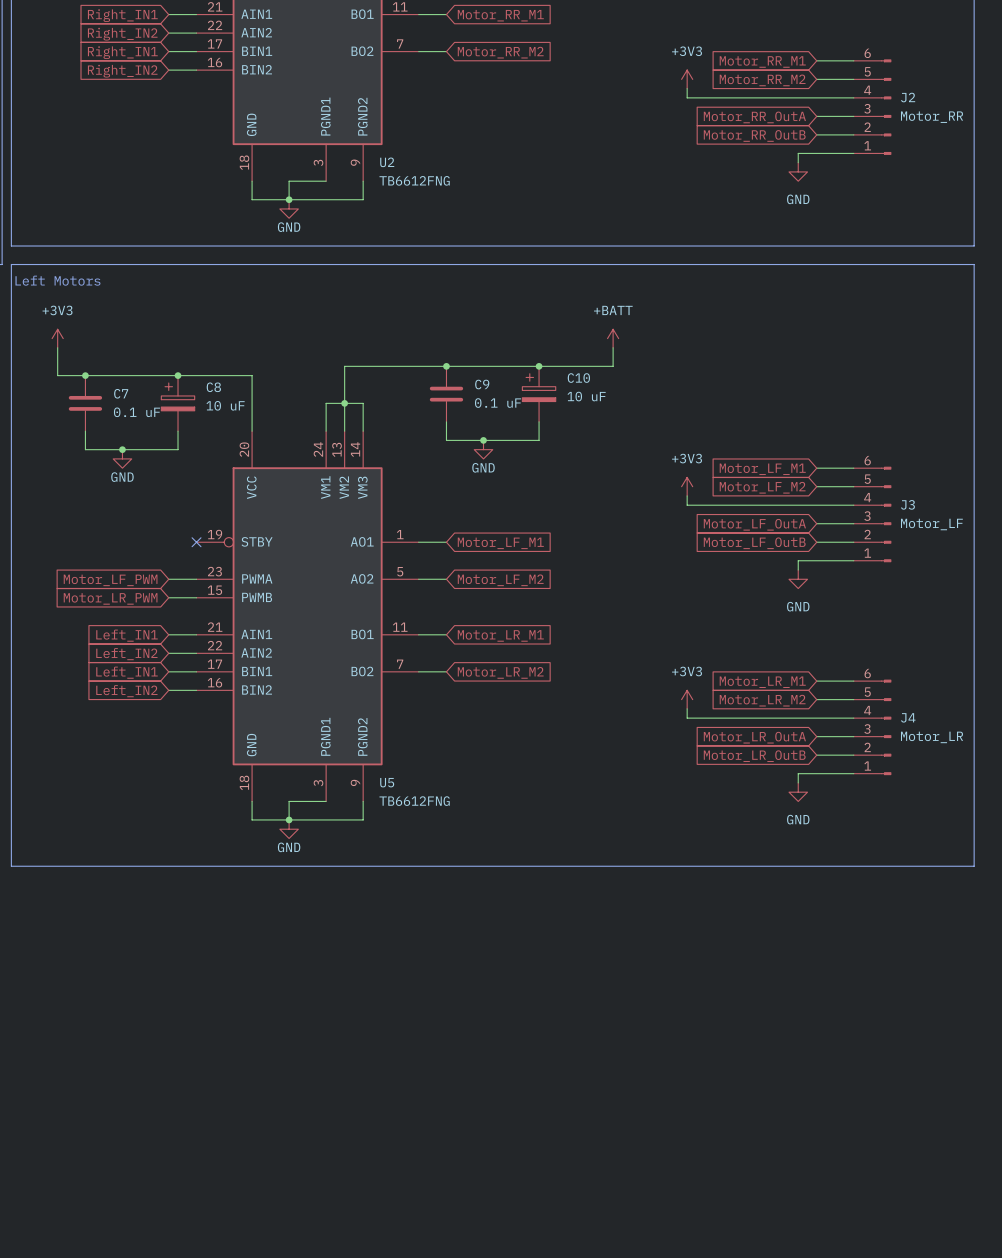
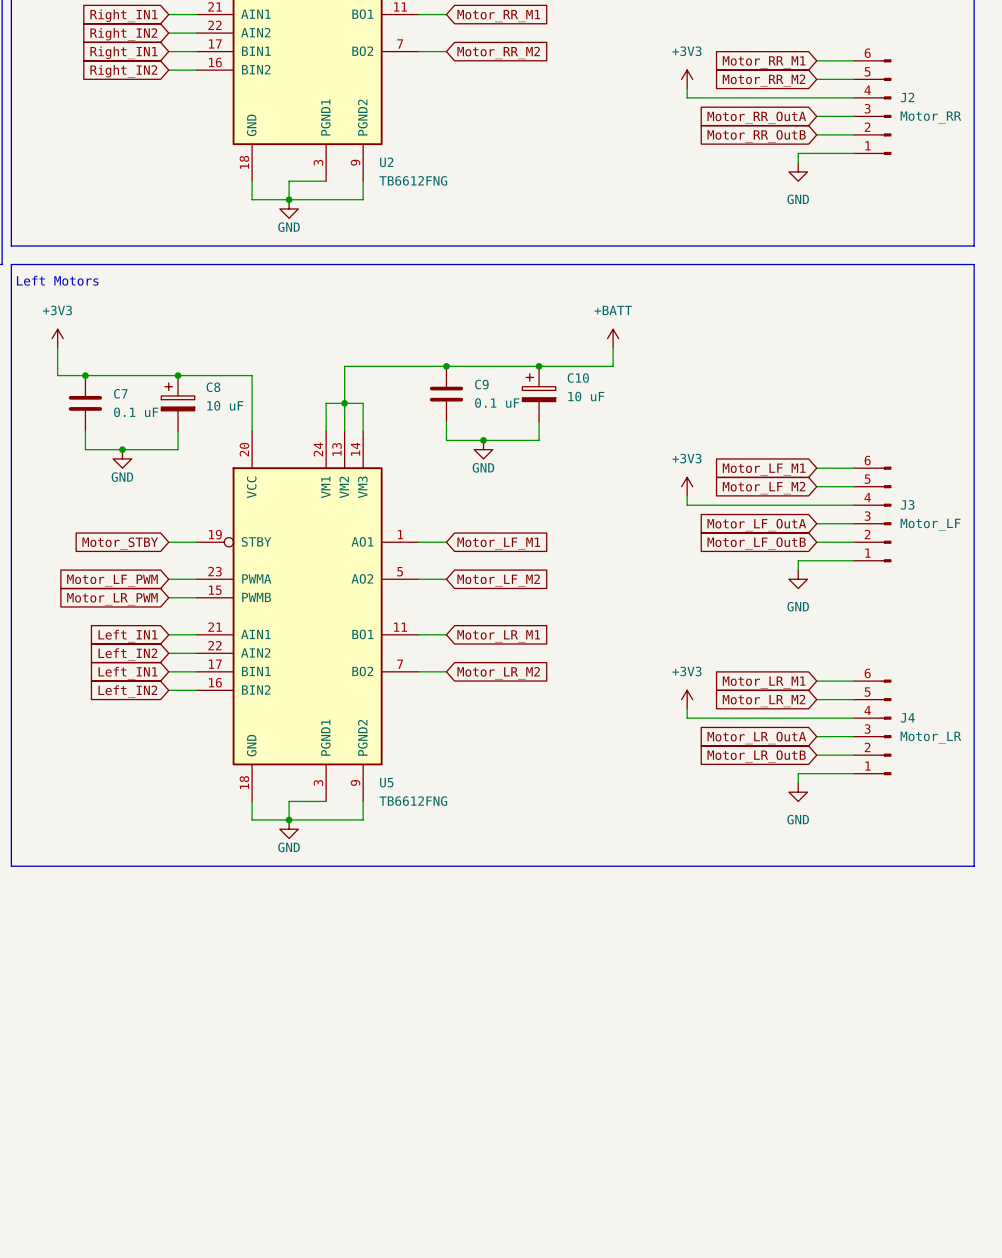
wire: none -> (168, 542) (196, 542)
no-connect mark: (196, 542) -> none
global label: none -> Motor_STBY (120, 543)

